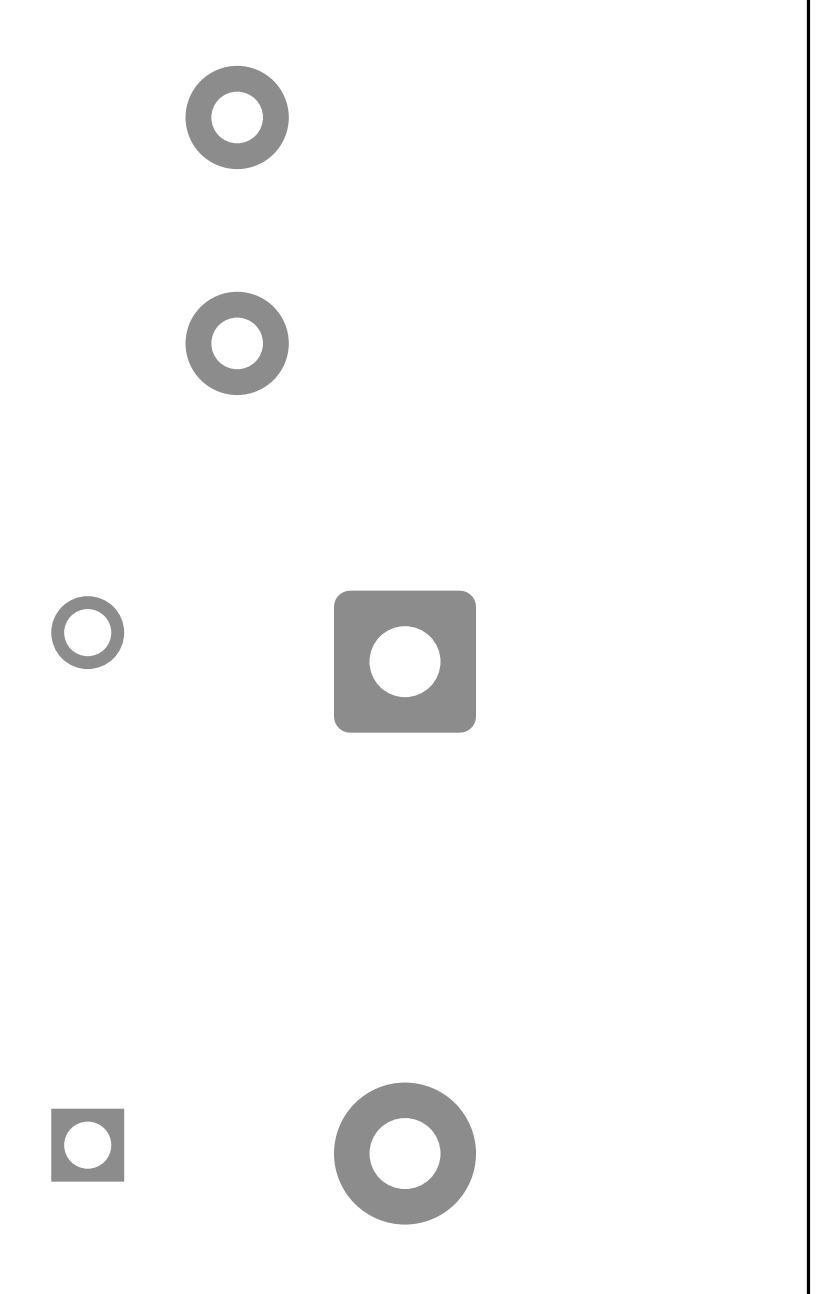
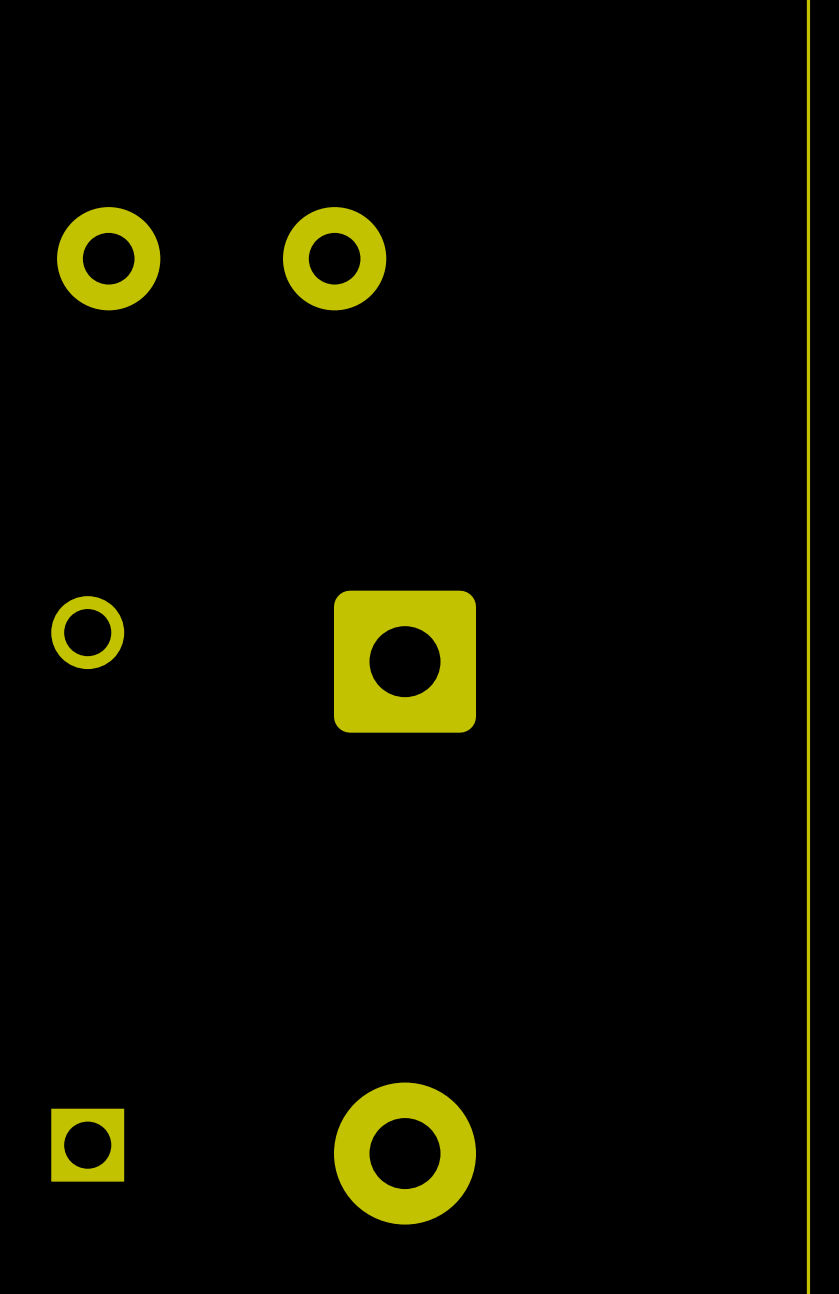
part rotation: 0° (237, 230) -> 90° clockwise (221, 258)

